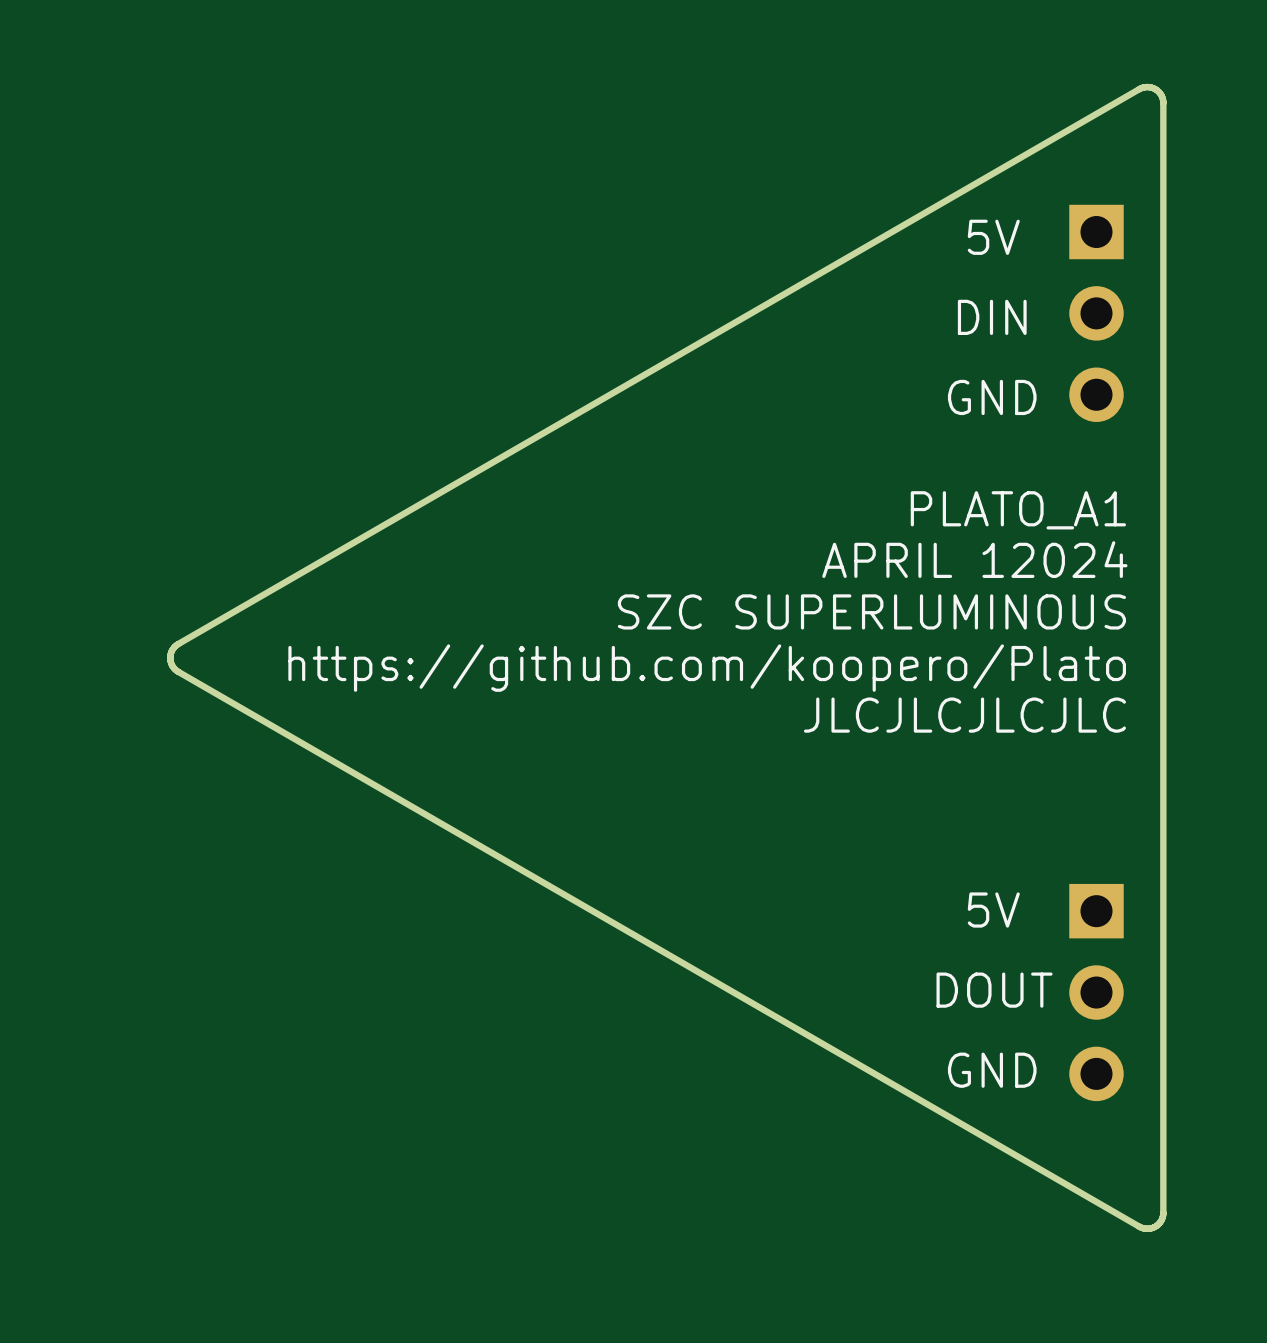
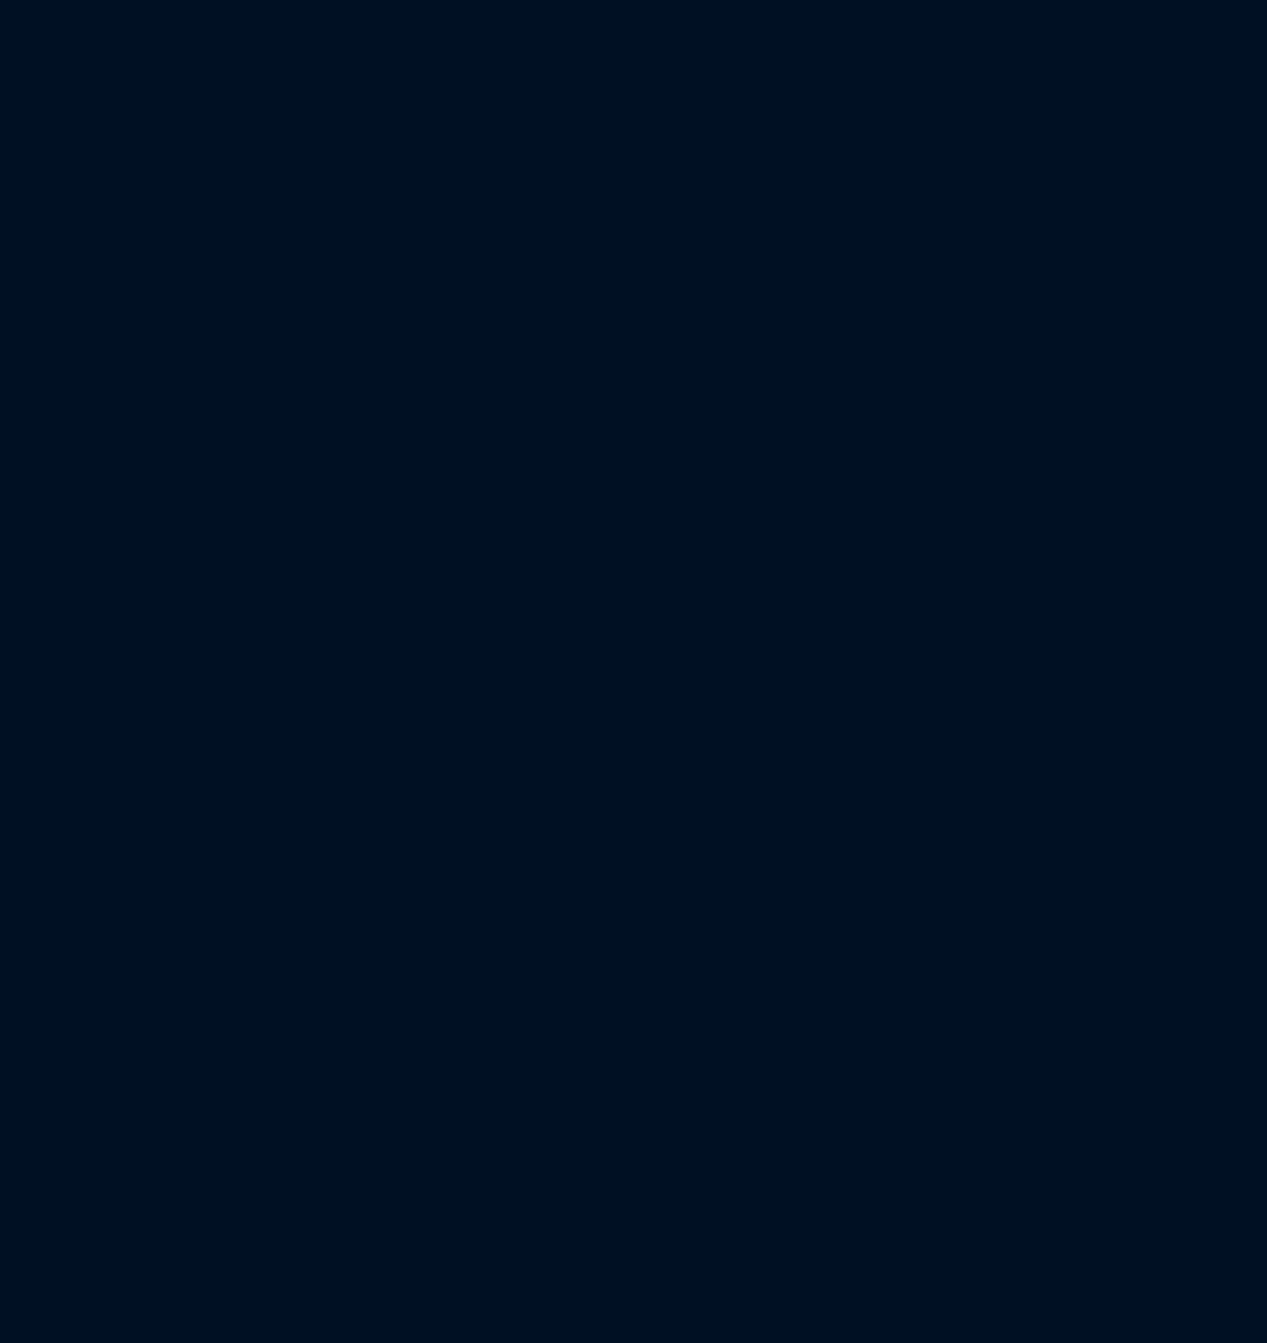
board edge: (1148, 87) (1158, 91) (1163, 103) (1163, 1212) (1158, 1224) (1146, 1228) (1139, 1226) (178, 671) (172, 666) (170, 657) (172, 649) (178, 644) (1139, 89) (1148, 87) -> none
text: 5V (993, 237) -> none
part: (1096, 313) -> none
text: DIN (992, 317) -> none
text: GND (992, 397) -> none
text: PLATO_A1 (1018, 510) -> none
text: APRIL 12024 (974, 559) -> none
text: SZC SUPERLUMINOUS (871, 611) -> none
text: https://github.com/koopero/Plato (707, 668) -> none
text: JLCJLCJLCJLC (964, 715) -> none
text: 5V (993, 910) -> none
text: DOUT (994, 990) -> none
part: (1096, 992) -> none
text: GND (992, 1070) -> none

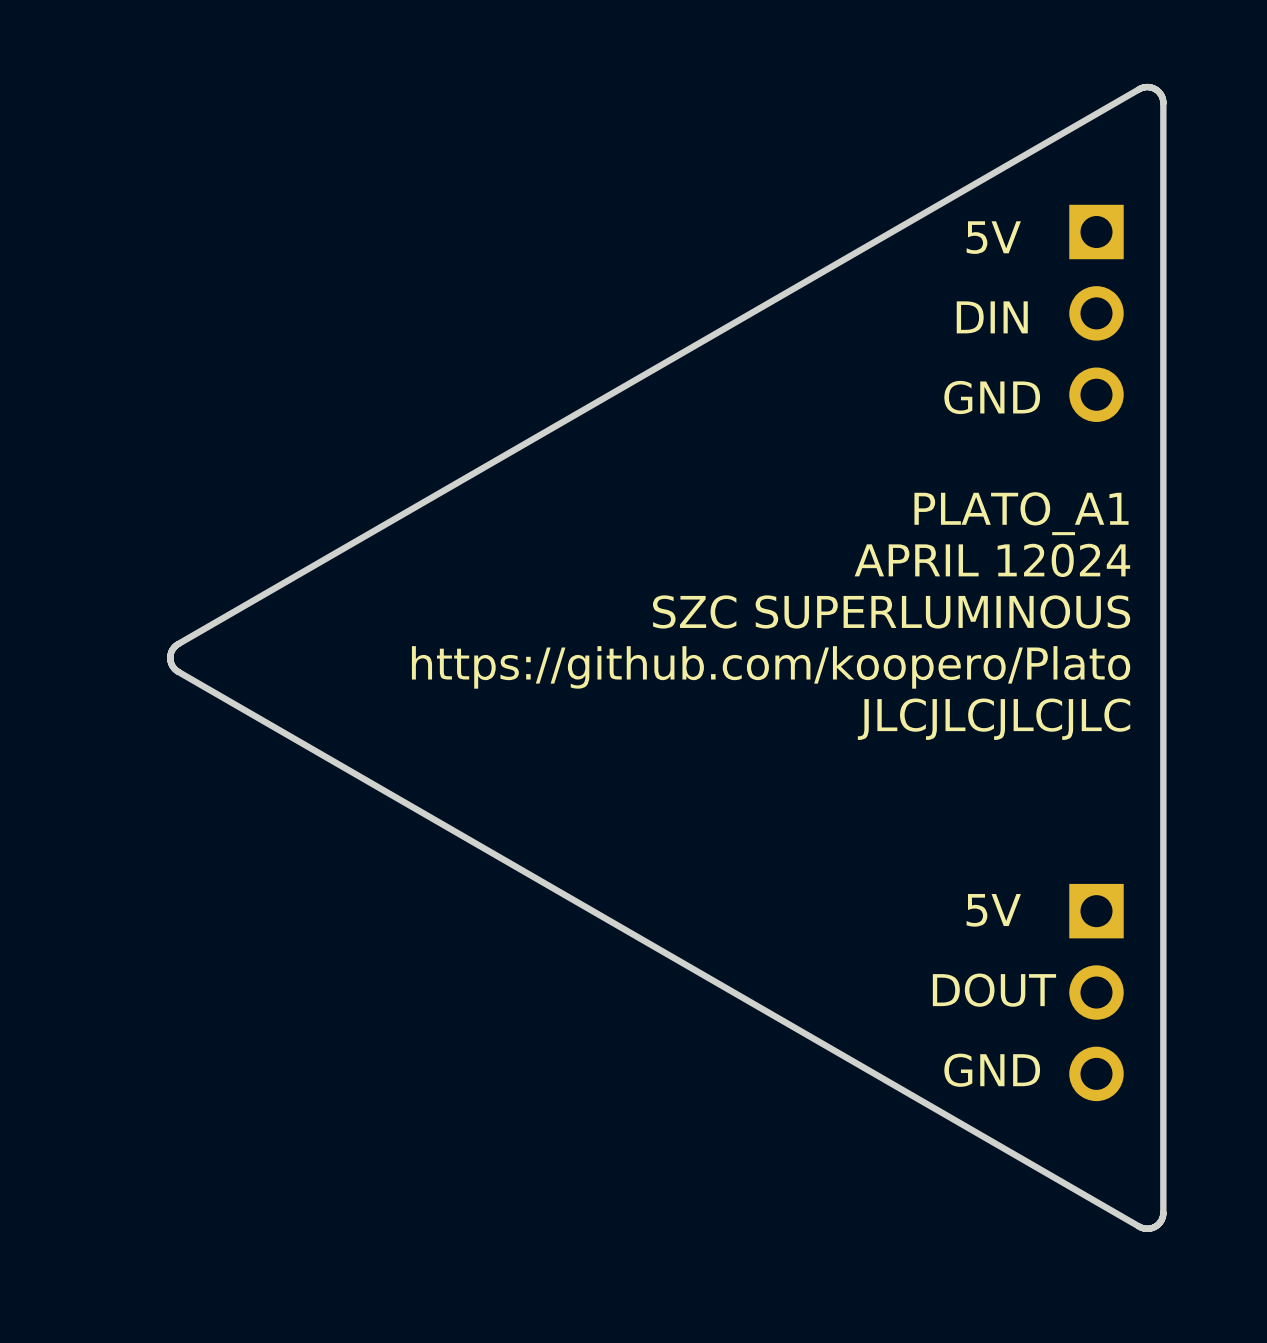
board edge: none -> (1148, 87) (1158, 91) (1163, 103) (1163, 1212) (1158, 1224) (1146, 1228) (1139, 1226) (178, 671) (172, 666) (170, 657) (172, 649) (178, 644) (1139, 89) (1148, 87)
text: none -> 5V (993, 237)
part: none -> (1096, 313)
text: none -> DIN (992, 317)
text: none -> GND (992, 397)
text: none -> PLATO_A1 (1021, 513)
text: none -> APRIL 12024 (992, 560)
text: none -> SZC SUPERLUMINOUS (891, 611)
text: none -> https://github.com/koopero/Plato (771, 667)
text: none -> JLCJLCJLCJLC (994, 719)
text: none -> 5V (993, 910)
text: none -> DOUT (994, 990)
part: none -> (1096, 992)
text: none -> GND (992, 1070)

